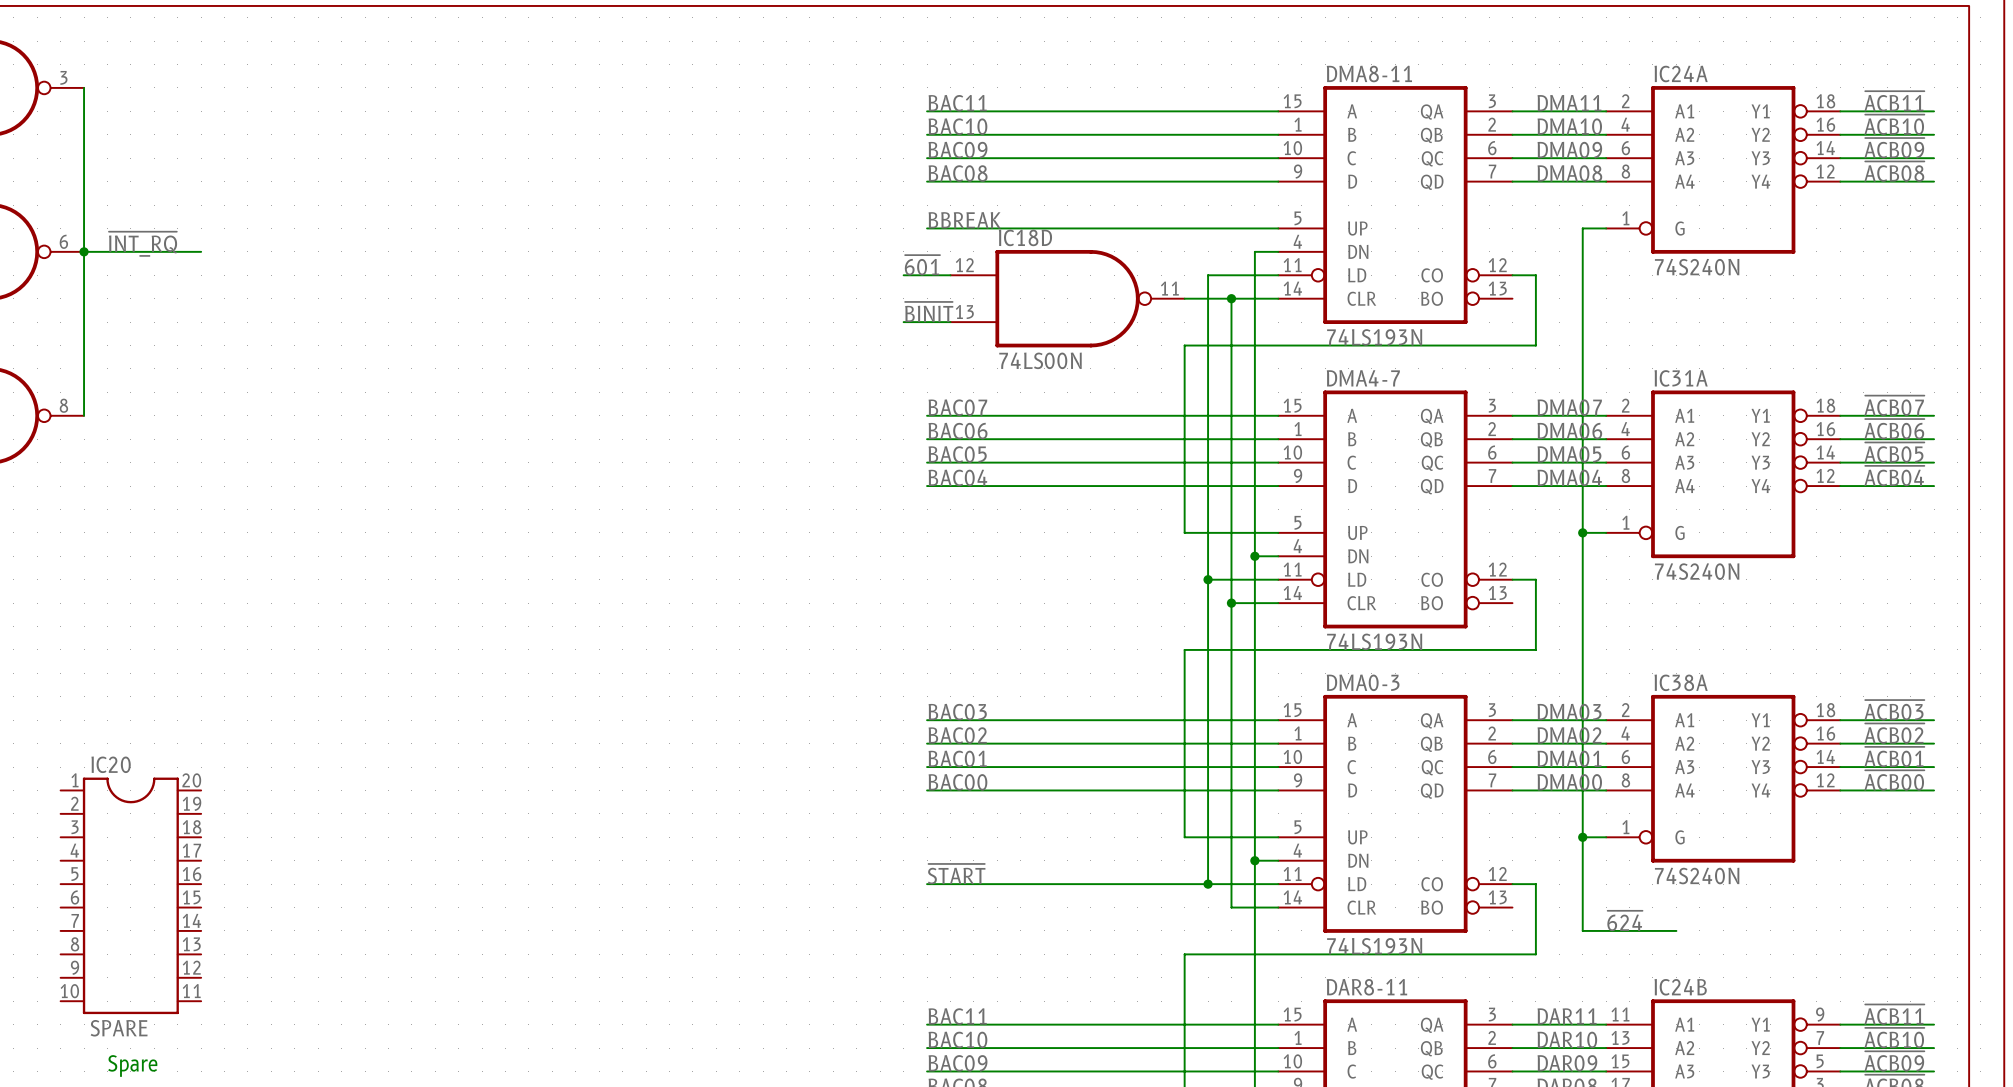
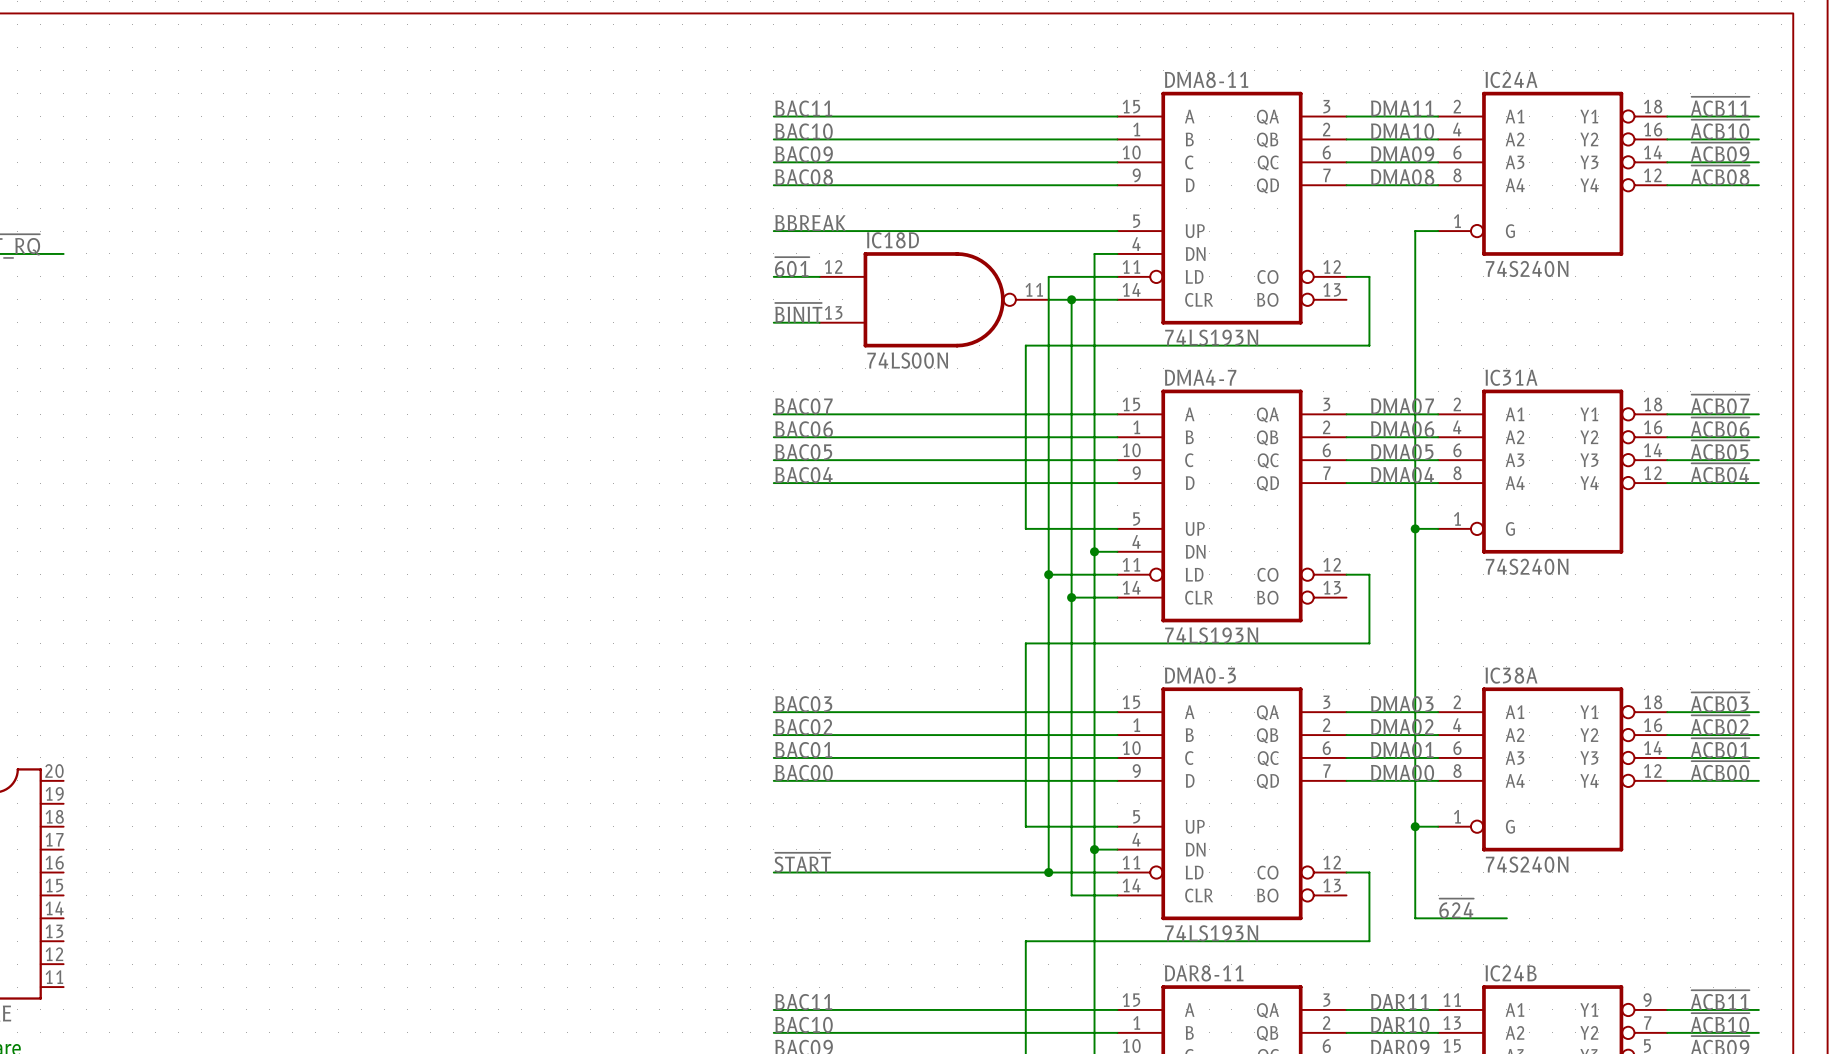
label position: ~{601} (922, 265) -> ~{601} (792, 267)
IC18D position: (1067, 298) -> (934, 299)
label position: ~{BINIT} (929, 312) -> ~{BINIT} (798, 312)

